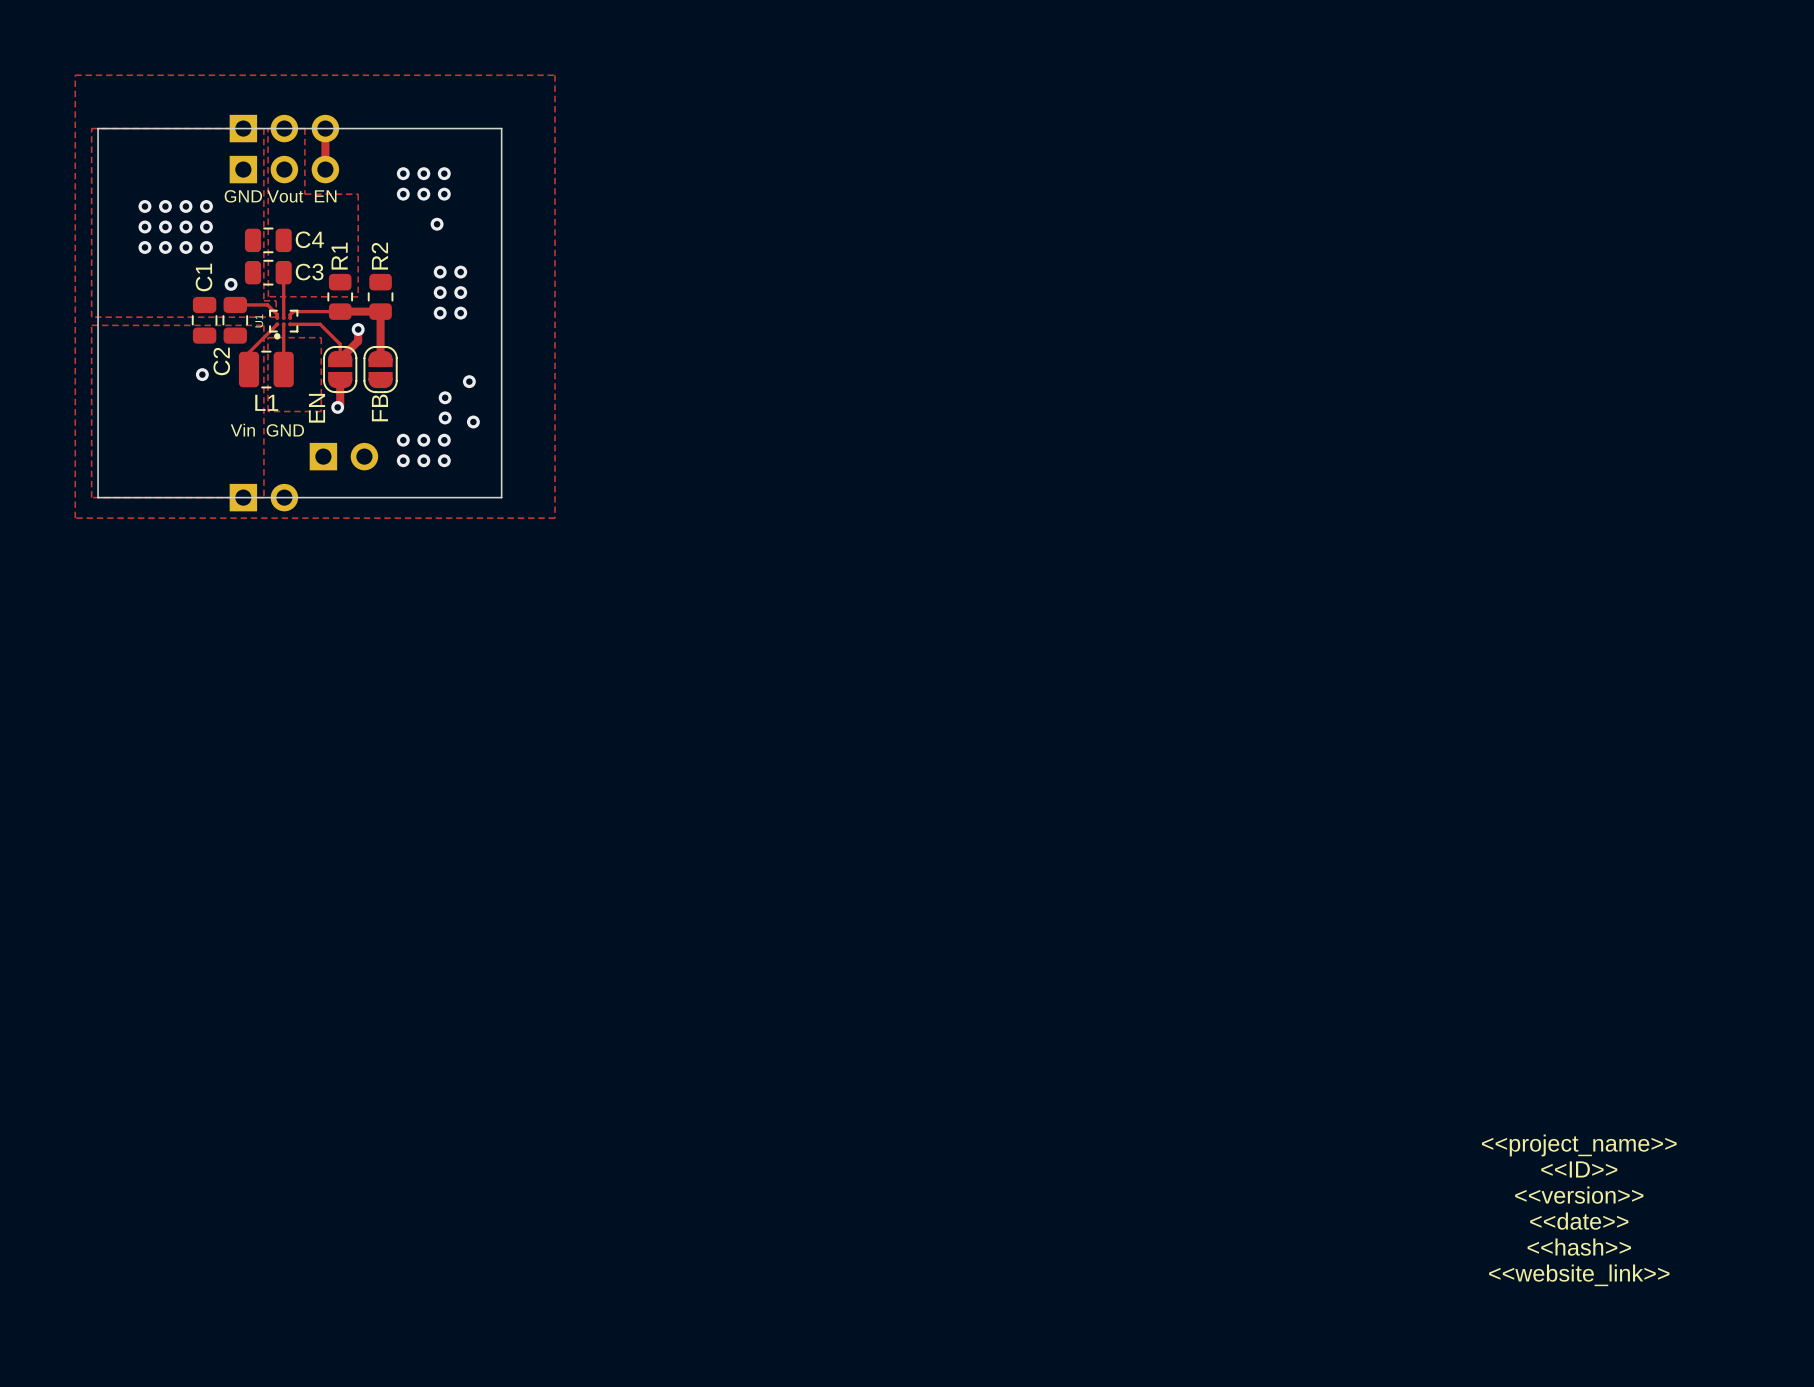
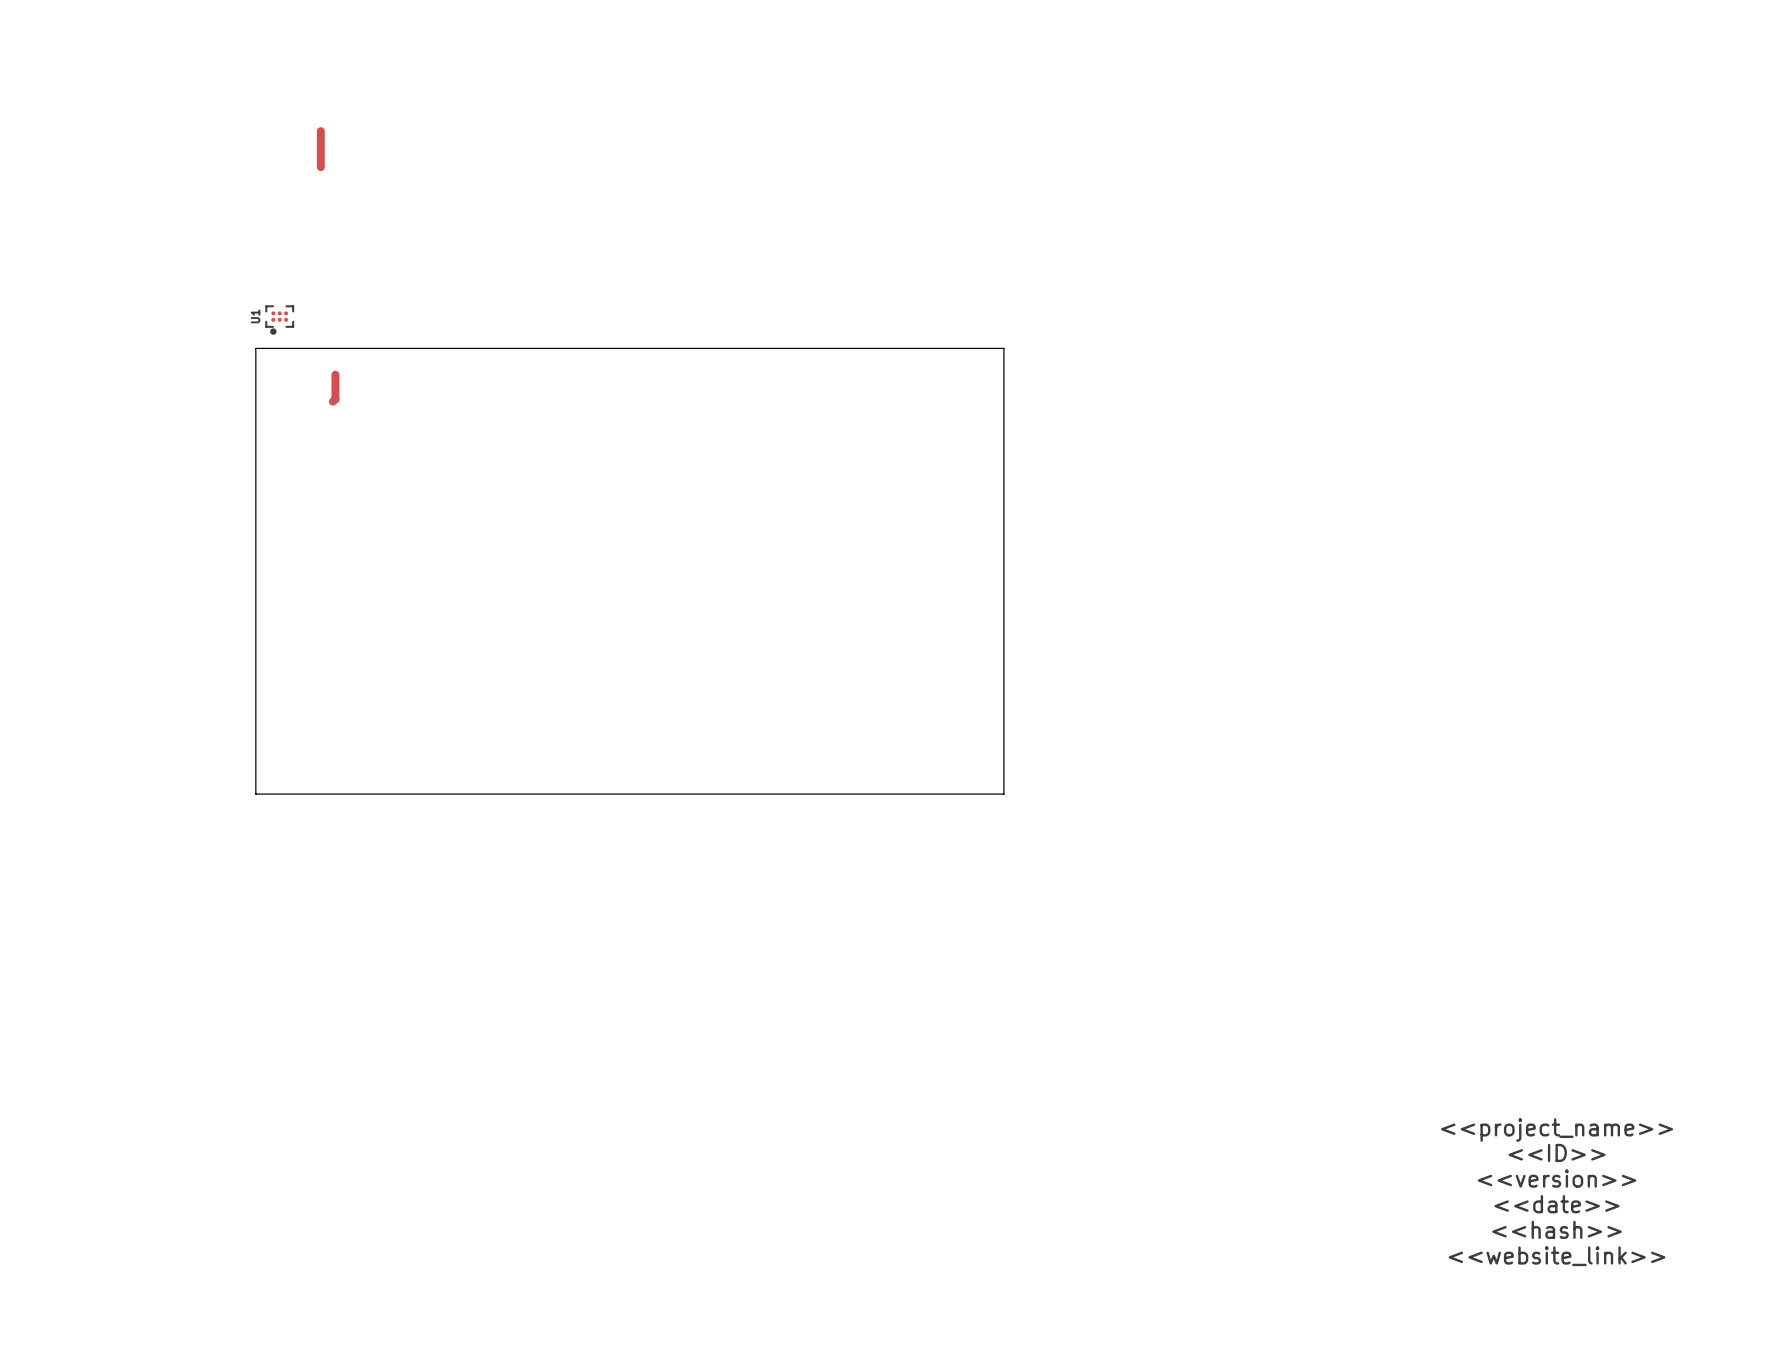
zone outline: (75, 75) (75, 518) (555, 518) (555, 75) (75, 75) -> none
zone outline: (91, 128) (91, 317) (276, 317) (276, 300) (263, 300) (263, 128) (91, 128) -> none
board edge: (98, 128) (501, 128) (501, 497) (98, 497) (98, 128) -> none
zone outline: (267, 128) (304, 128) (304, 194) (358, 194) (358, 296) (268, 296) (267, 128) -> none
part: (284, 128) -> none
part: (284, 169) -> none
via: (403, 173) -> none
via: (423, 173) -> none
via: (444, 173) -> none
via: (403, 194) -> none
via: (423, 194) -> none
via: (444, 194) -> none
text: GND (243, 196) -> none
text: Vout (285, 196) -> none
text: EN (325, 196) -> none
via: (144, 206) -> none
via: (165, 206) -> none
via: (185, 206) -> none
via: (206, 206) -> none
via: (437, 224) -> none
via: (144, 226) -> none
via: (165, 226) -> none
via: (185, 226) -> none
via: (206, 226) -> none
C4: (268, 240) -> none
via: (144, 247) -> none
via: (165, 247) -> none
via: (185, 247) -> none
via: (206, 247) -> none
C3: (268, 272) -> none
track: (283, 272) (283, 317) -> none
via: (440, 272) -> none
via: (460, 272) -> none
via: (231, 284) -> none
via: (440, 292) -> none
via: (460, 292) -> none
R1: (340, 296) -> none
R2: (380, 296) -> none
track: (235, 304) (267, 304) (277, 314) (277, 317) -> none
via: (440, 313) -> none
via: (460, 313) -> none
track: (290, 317) (293, 311) (380, 311) (380, 359) -> none
C1: (204, 320) -> none
C2: (235, 320) -> none
track: (277, 324) (249, 352) (249, 369) -> none
track: (283, 324) (283, 369) -> none
track: (290, 324) (320, 324) (340, 344) (340, 359) -> none
zone outline: (91, 325) (91, 497) (263, 497) (263, 325) (91, 325) -> none
track: (358, 329) (358, 341) (340, 359) -> none
via: (358, 329) -> none
zone outline: (267, 337) (267, 411) (321, 411) (321, 337) (267, 337) -> none
board edge: none -> (255, 348) (1003, 348) (1003, 794) (255, 794) (255, 348)
L1: (266, 369) -> none
part: (340, 369) -> none
part: (380, 369) -> none
via: (202, 374) -> none
via: (469, 381) -> none
via: (445, 397) -> none
via: (337, 407) -> none
via: (445, 417) -> none
via: (473, 422) -> none
text: Vin (242, 430) -> none
text: GND (285, 430) -> none
via: (403, 440) -> none
via: (423, 440) -> none
via: (444, 440) -> none
part: (343, 456) -> none
via: (403, 460) -> none
via: (423, 460) -> none
via: (444, 460) -> none
part: (263, 497) -> none

